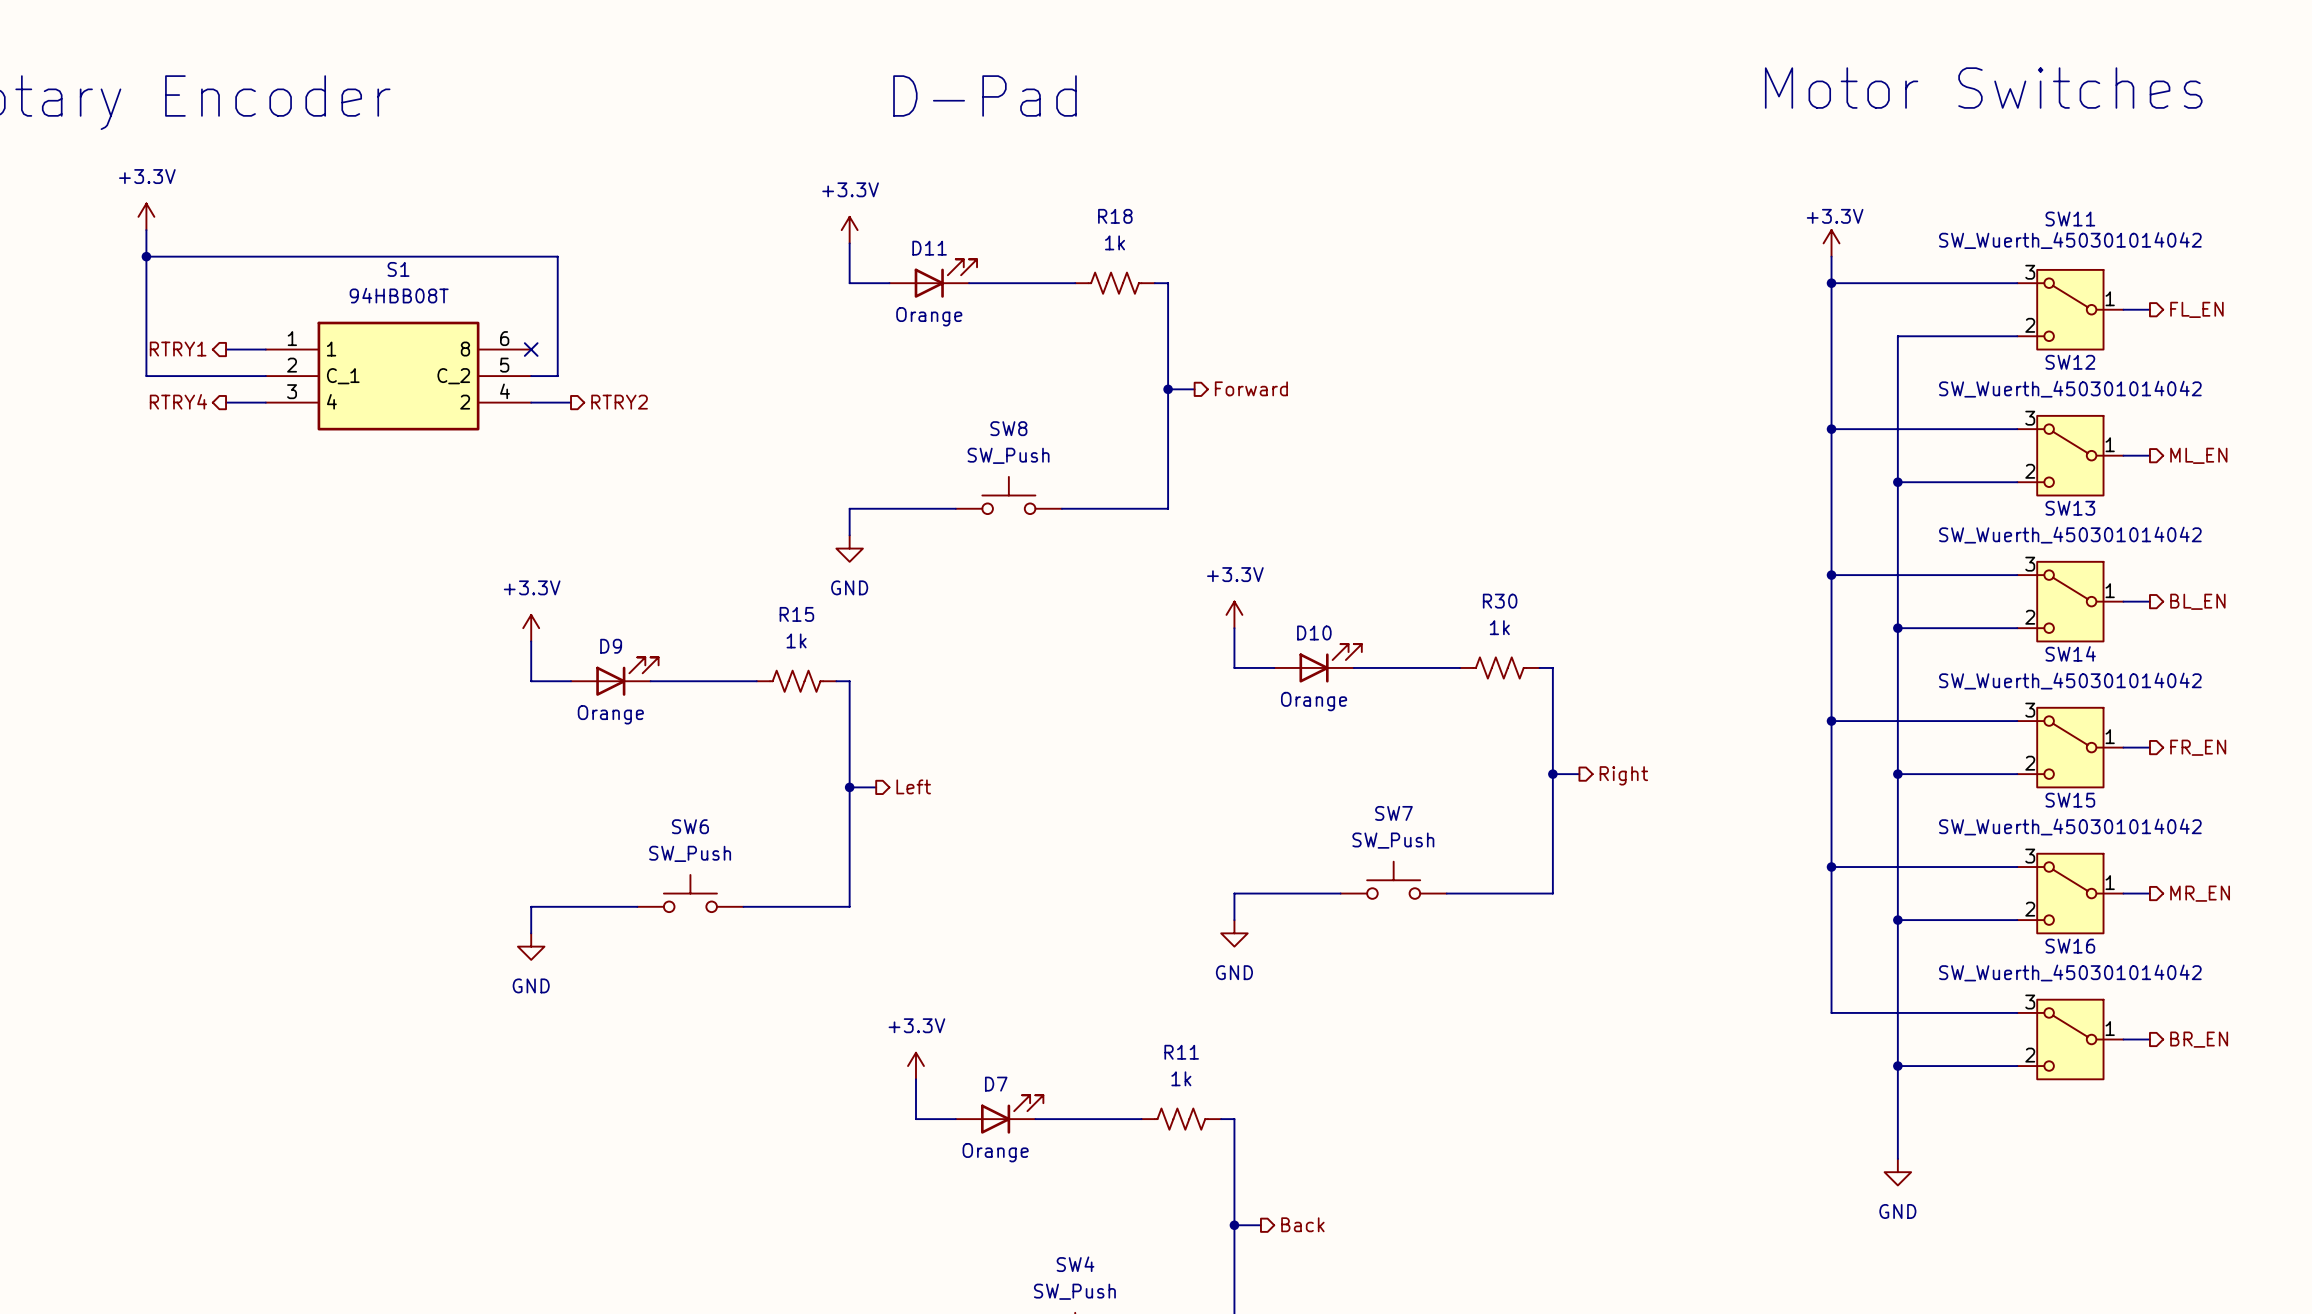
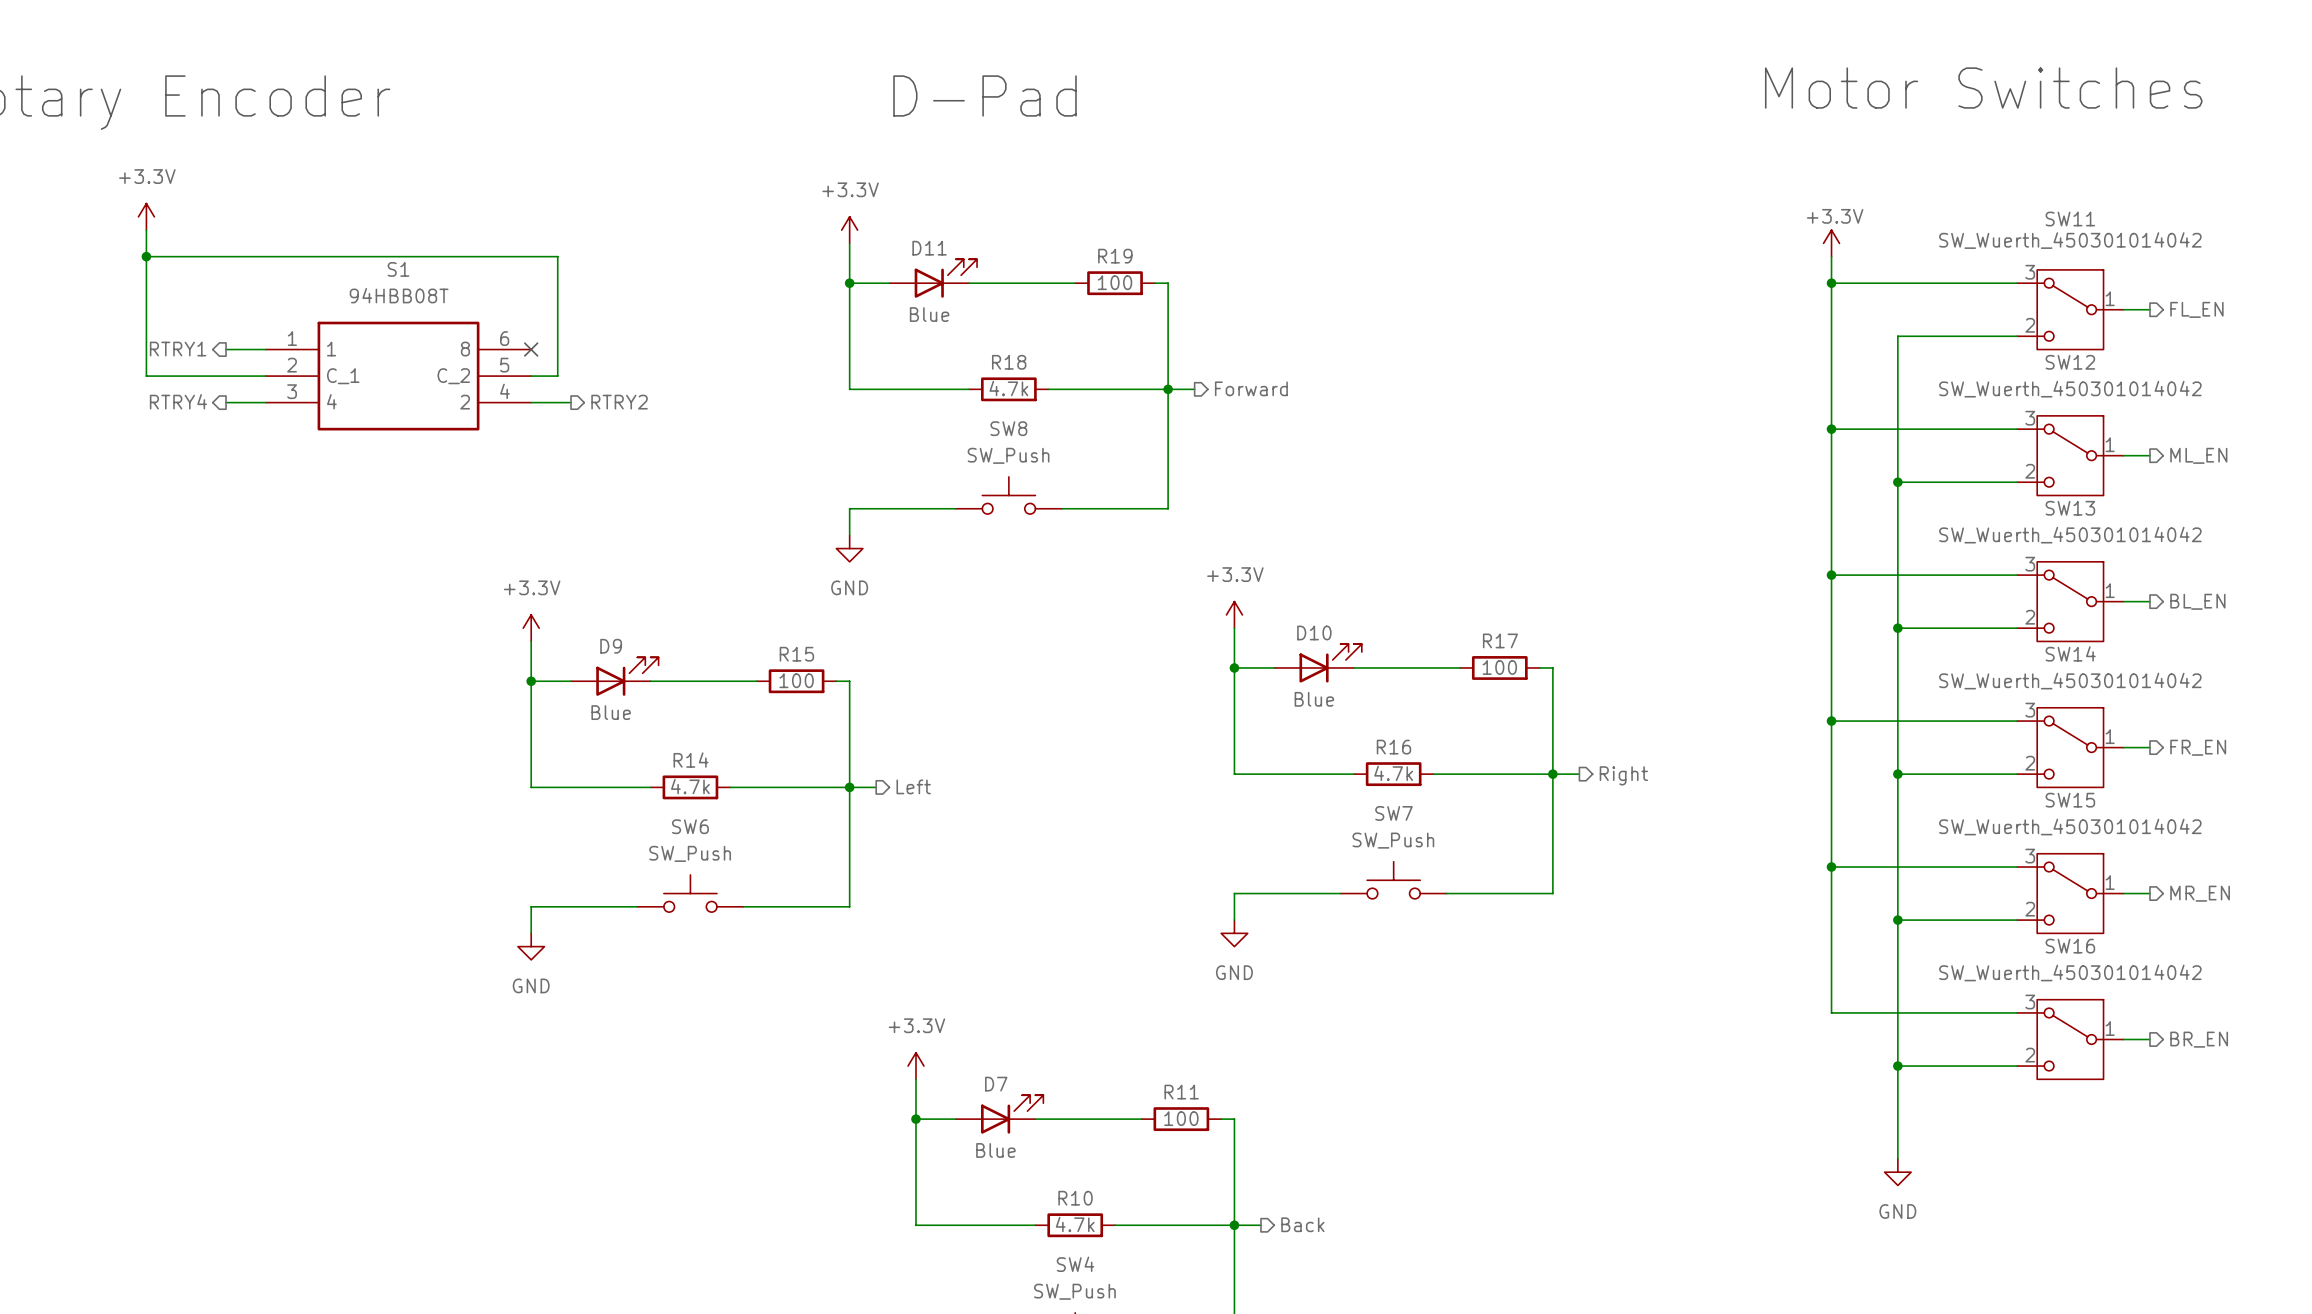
R18 name position: R18 (1115, 216) -> R18 (1009, 362)
R18 value: 1k (1115, 242) -> 4.7k (1008, 388)
R18 symbol: [1075, 272, 1155, 294] -> [969, 377, 1049, 402]
wire: none -> (849, 283) (849, 389) (969, 389)
junction: none -> (849, 283)
R19: none -> 100 (1115, 283)
D11 value: Orange (929, 316) -> Blue (929, 314)
wire: none -> (1048, 389) (1168, 389)
R15 name position: R15 (796, 614) -> R15 (796, 654)
R15 value: 1k (796, 640) -> 100 (796, 680)
wire: none -> (1234, 667) (1234, 774) (1353, 774)
junction: none -> (1234, 667)
R30: 1k (1499, 667) -> none
R17: none -> 100 (1499, 667)
R15 symbol: [756, 670, 837, 692] -> [756, 669, 837, 694]
wire: none -> (531, 681) (531, 787) (650, 787)
junction: none -> (531, 681)
D10 value: Orange (1314, 701) -> Blue (1314, 699)
D9 value: Orange (610, 714) -> Blue (611, 712)
R16: none -> 4.7k (1393, 774)
wire: none -> (1433, 774) (1552, 774)
R14: none -> 4.7k (690, 787)
wire: none -> (730, 787) (849, 787)
R11 name position: R11 (1181, 1052) -> R11 (1181, 1092)
R11 value: 1k (1181, 1078) -> 100 (1181, 1118)
R11 symbol: [1141, 1108, 1222, 1130] -> [1141, 1107, 1222, 1132]
wire: none -> (915, 1119) (915, 1225) (1035, 1225)
junction: none -> (915, 1119)
D7 value: Orange (995, 1152) -> Blue (995, 1150)
R10: none -> 4.7k (1075, 1225)
wire: none -> (1115, 1225) (1234, 1225)

